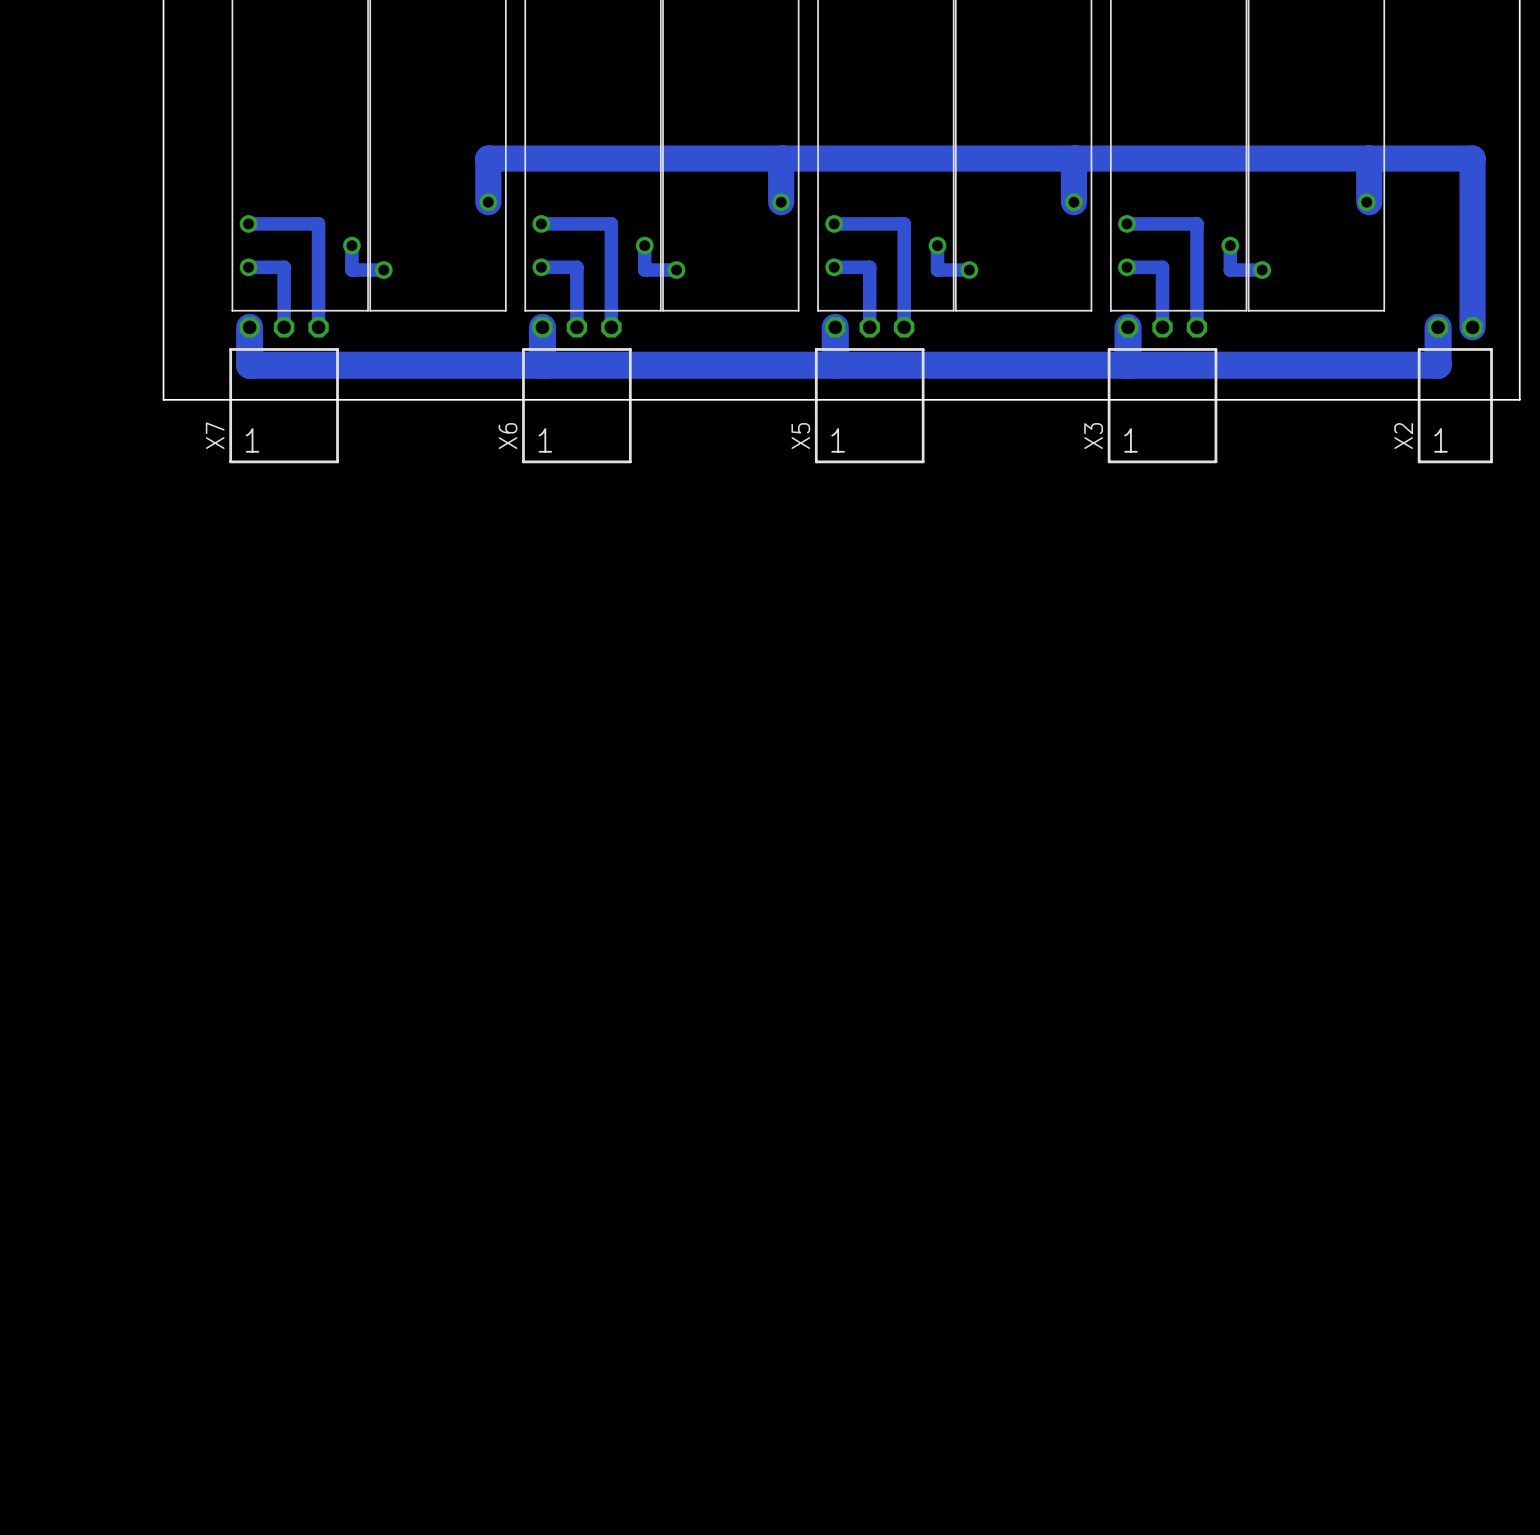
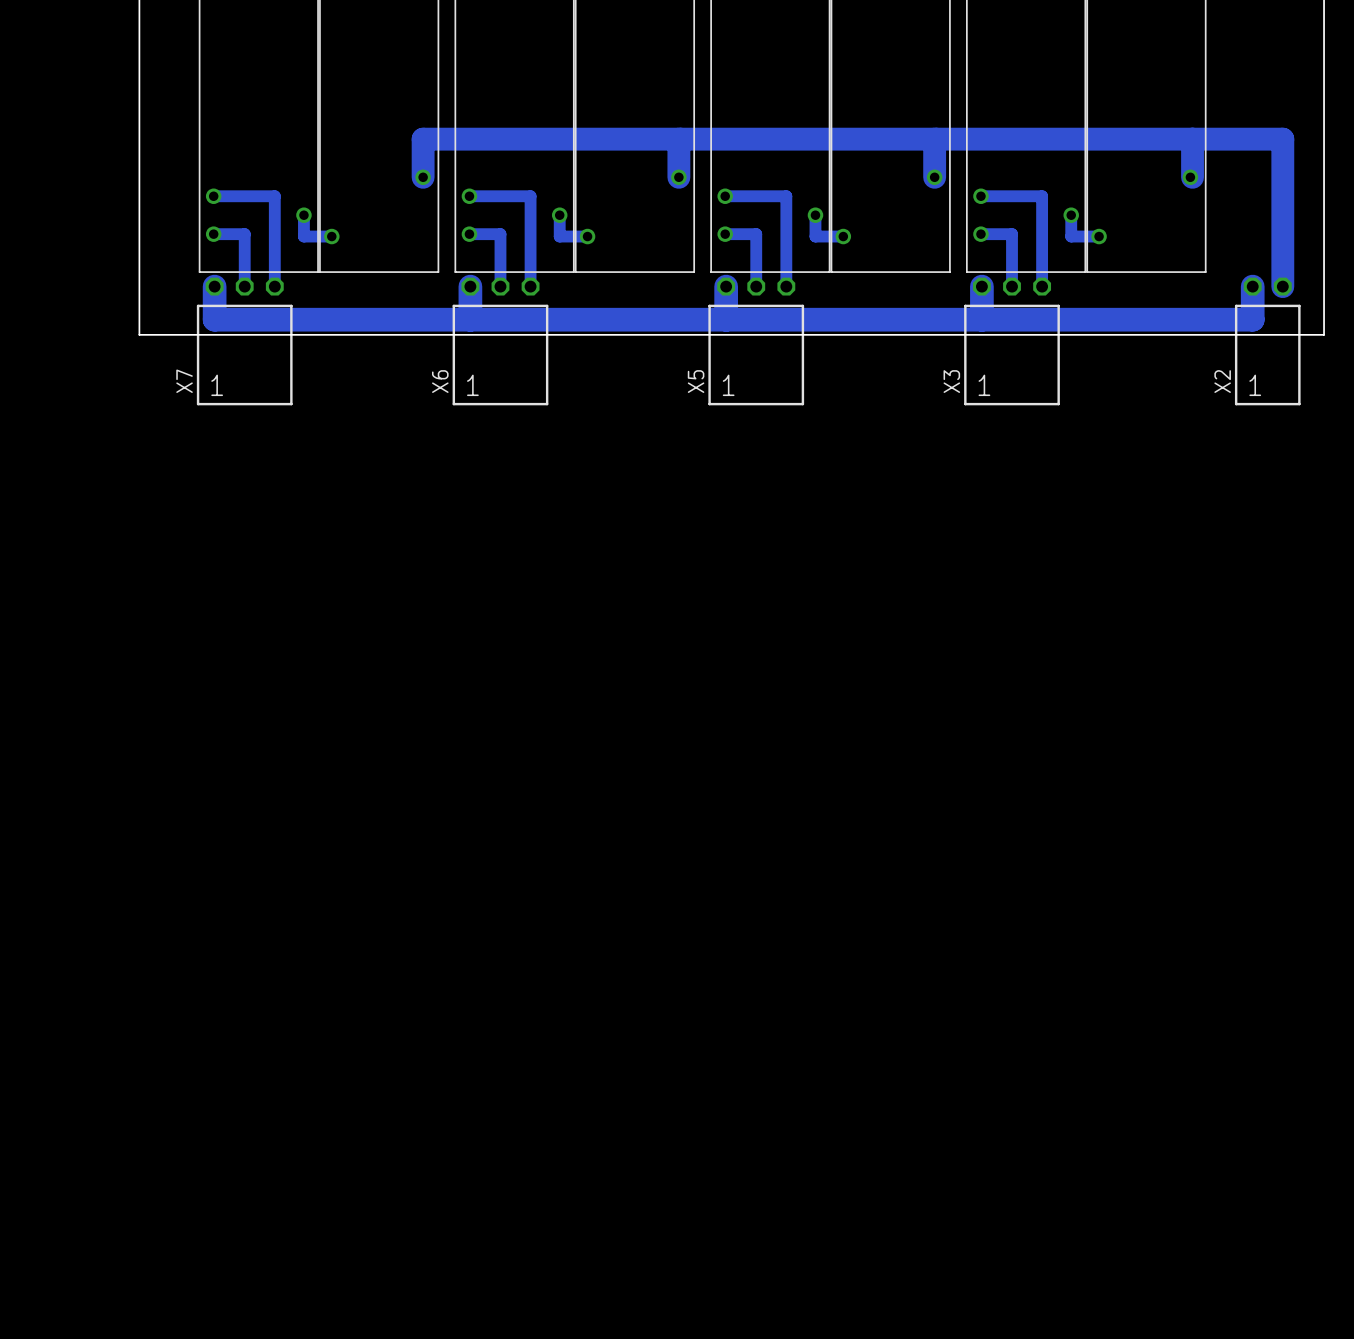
board edge: (163, 382) (163, 399) -> (139, 334) (1324, 334)
board edge: (1519, 382) (1519, 399) -> none
board edge: (163, 399) (1519, 399) -> none

